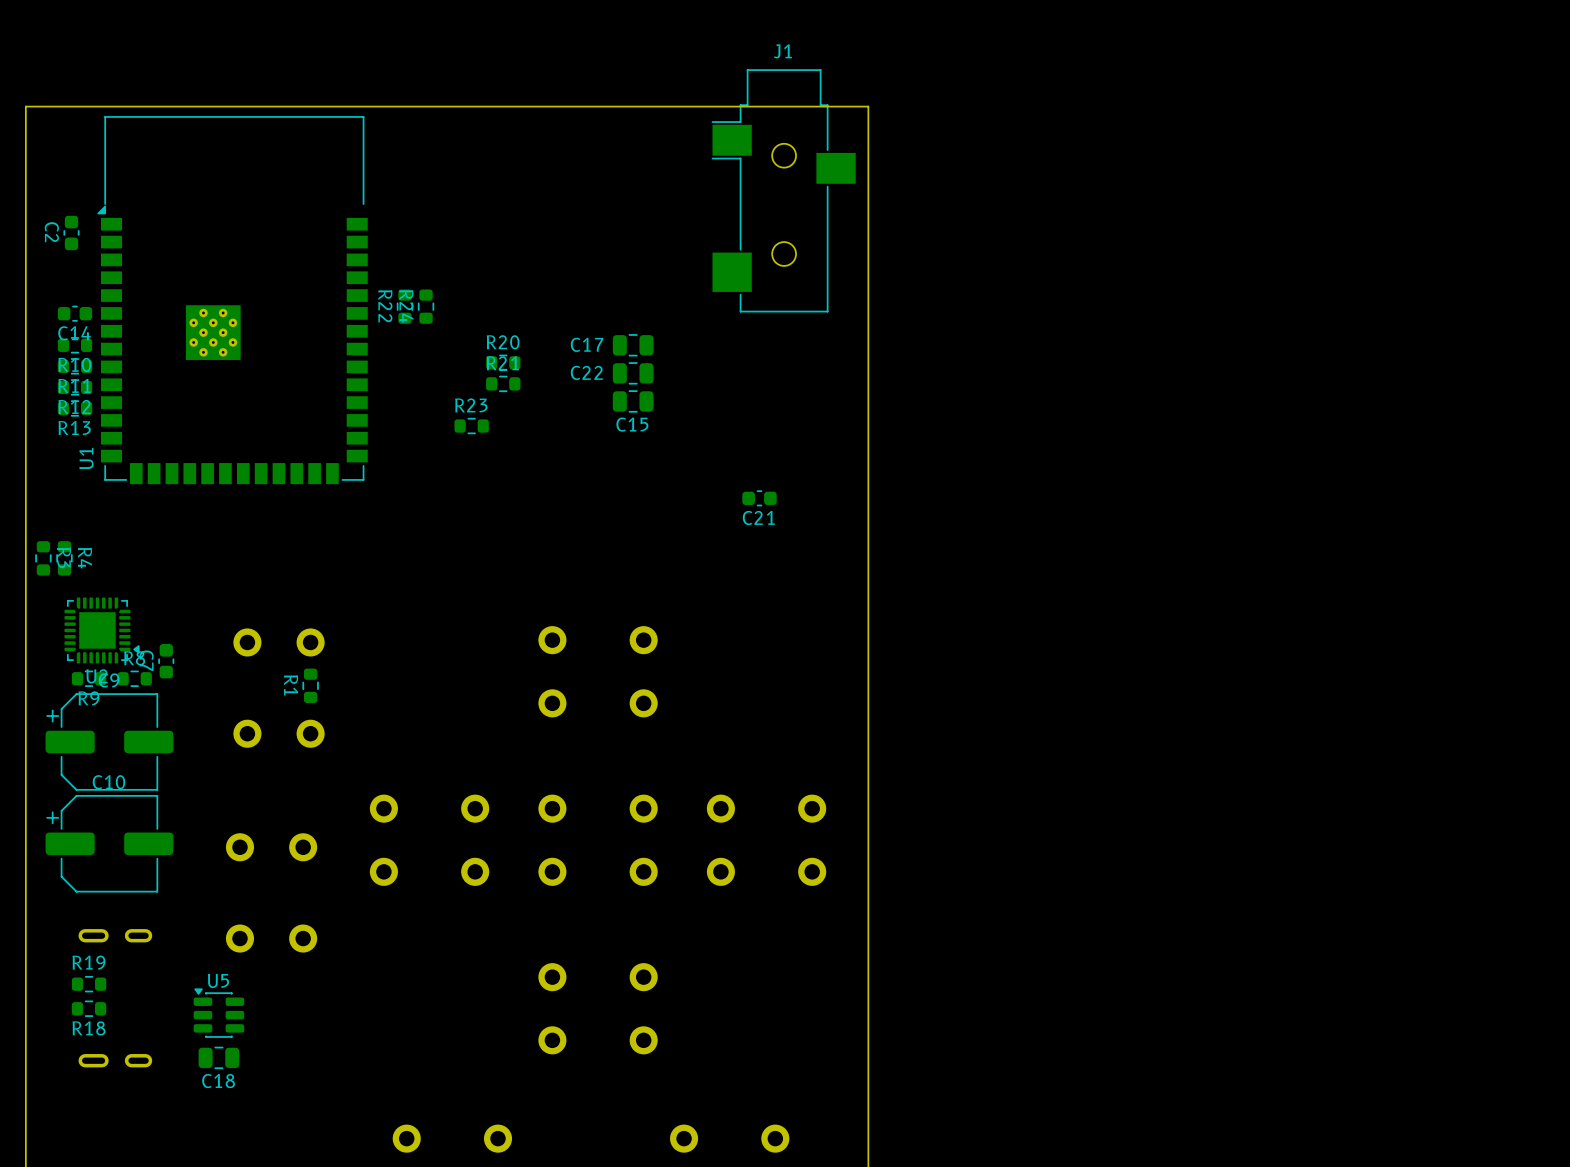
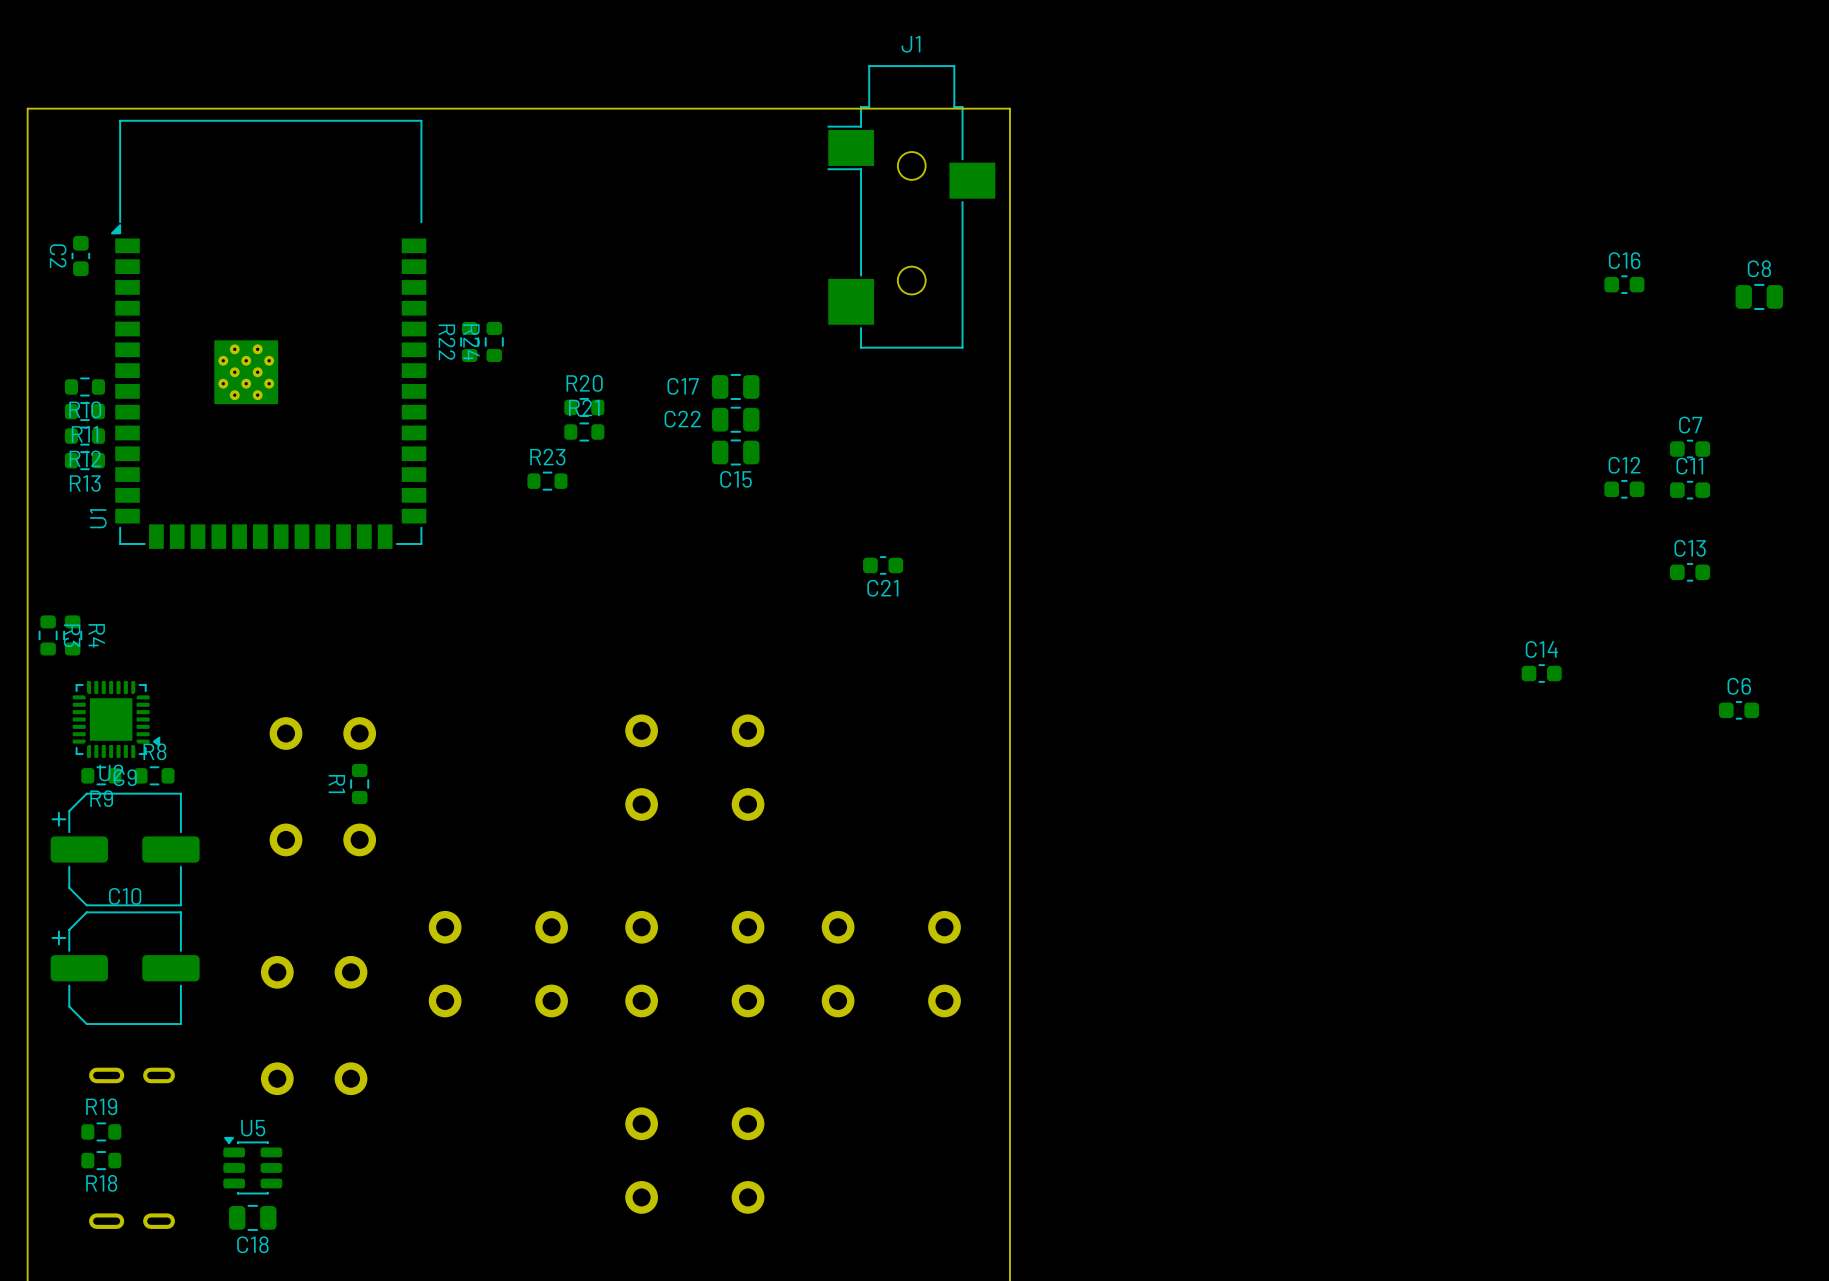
C16: none -> (1624, 284)
C8: none -> (1759, 296)
C14 position: (75, 313) -> (1541, 673)
C14 name position: C14 (74, 333) -> C14 (1541, 649)
C12: none -> (1624, 489)
C11: none -> (1690, 490)
C13: none -> (1690, 572)
C6: none -> (1739, 710)
C7 rotation: 0° (166, 661) -> 90° clockwise (1690, 449)
C7 position: (166, 661) -> (1690, 449)

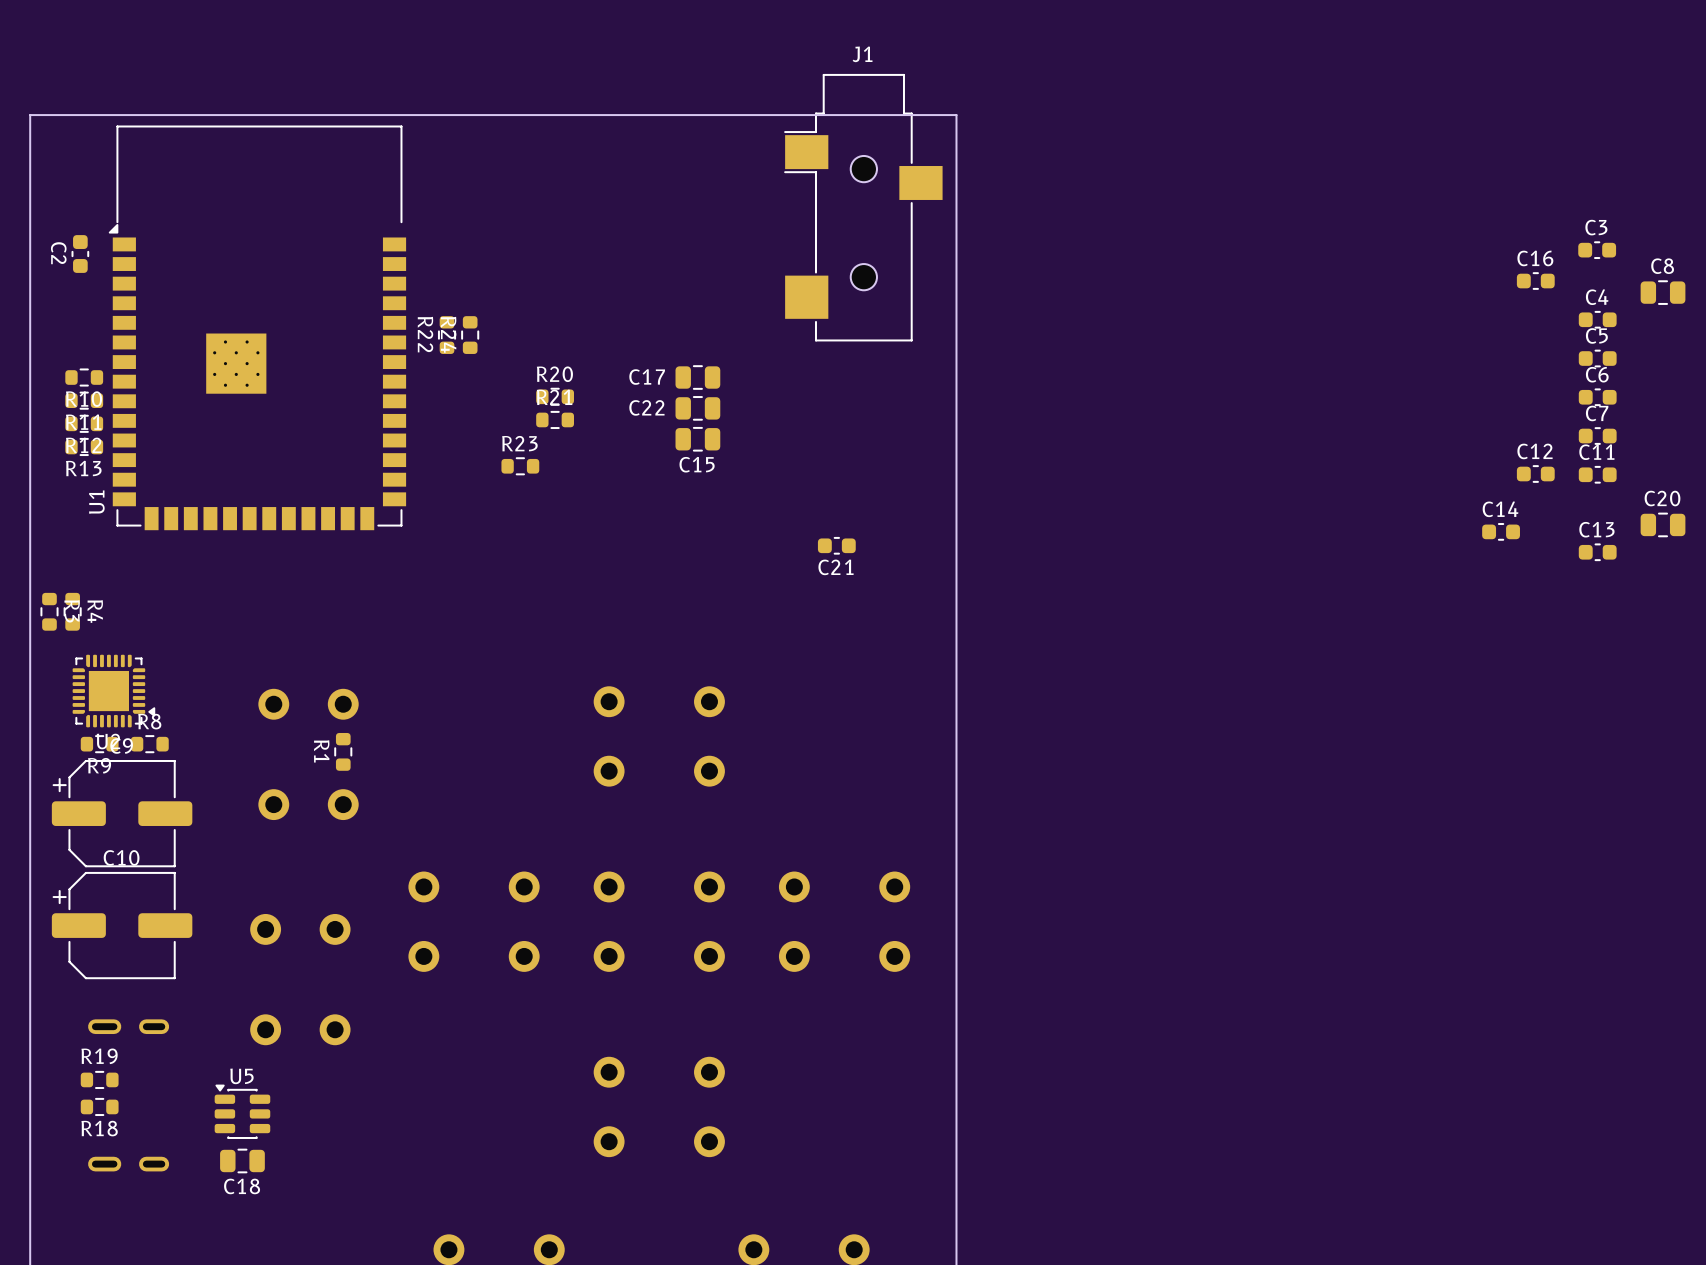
C3: none -> (1597, 250)
C4: none -> (1597, 319)
C5: none -> (1597, 358)
C20: none -> (1663, 524)
C14 position: (1541, 673) -> (1501, 531)
C6 position: (1739, 710) -> (1597, 397)

